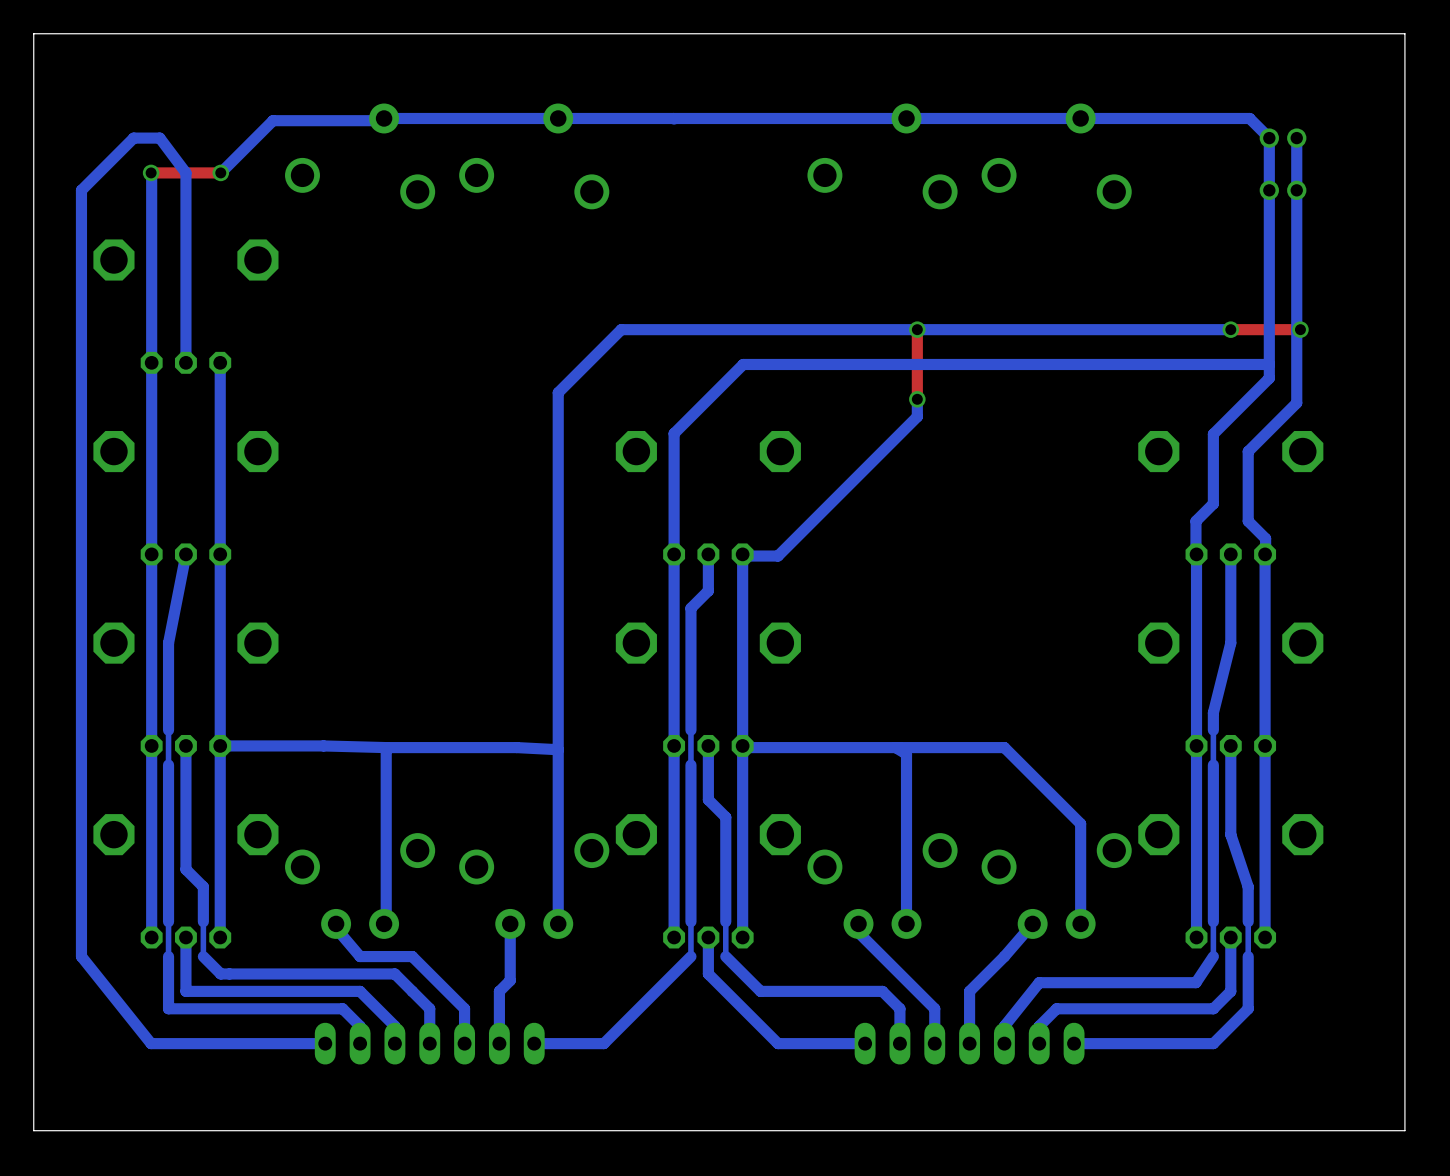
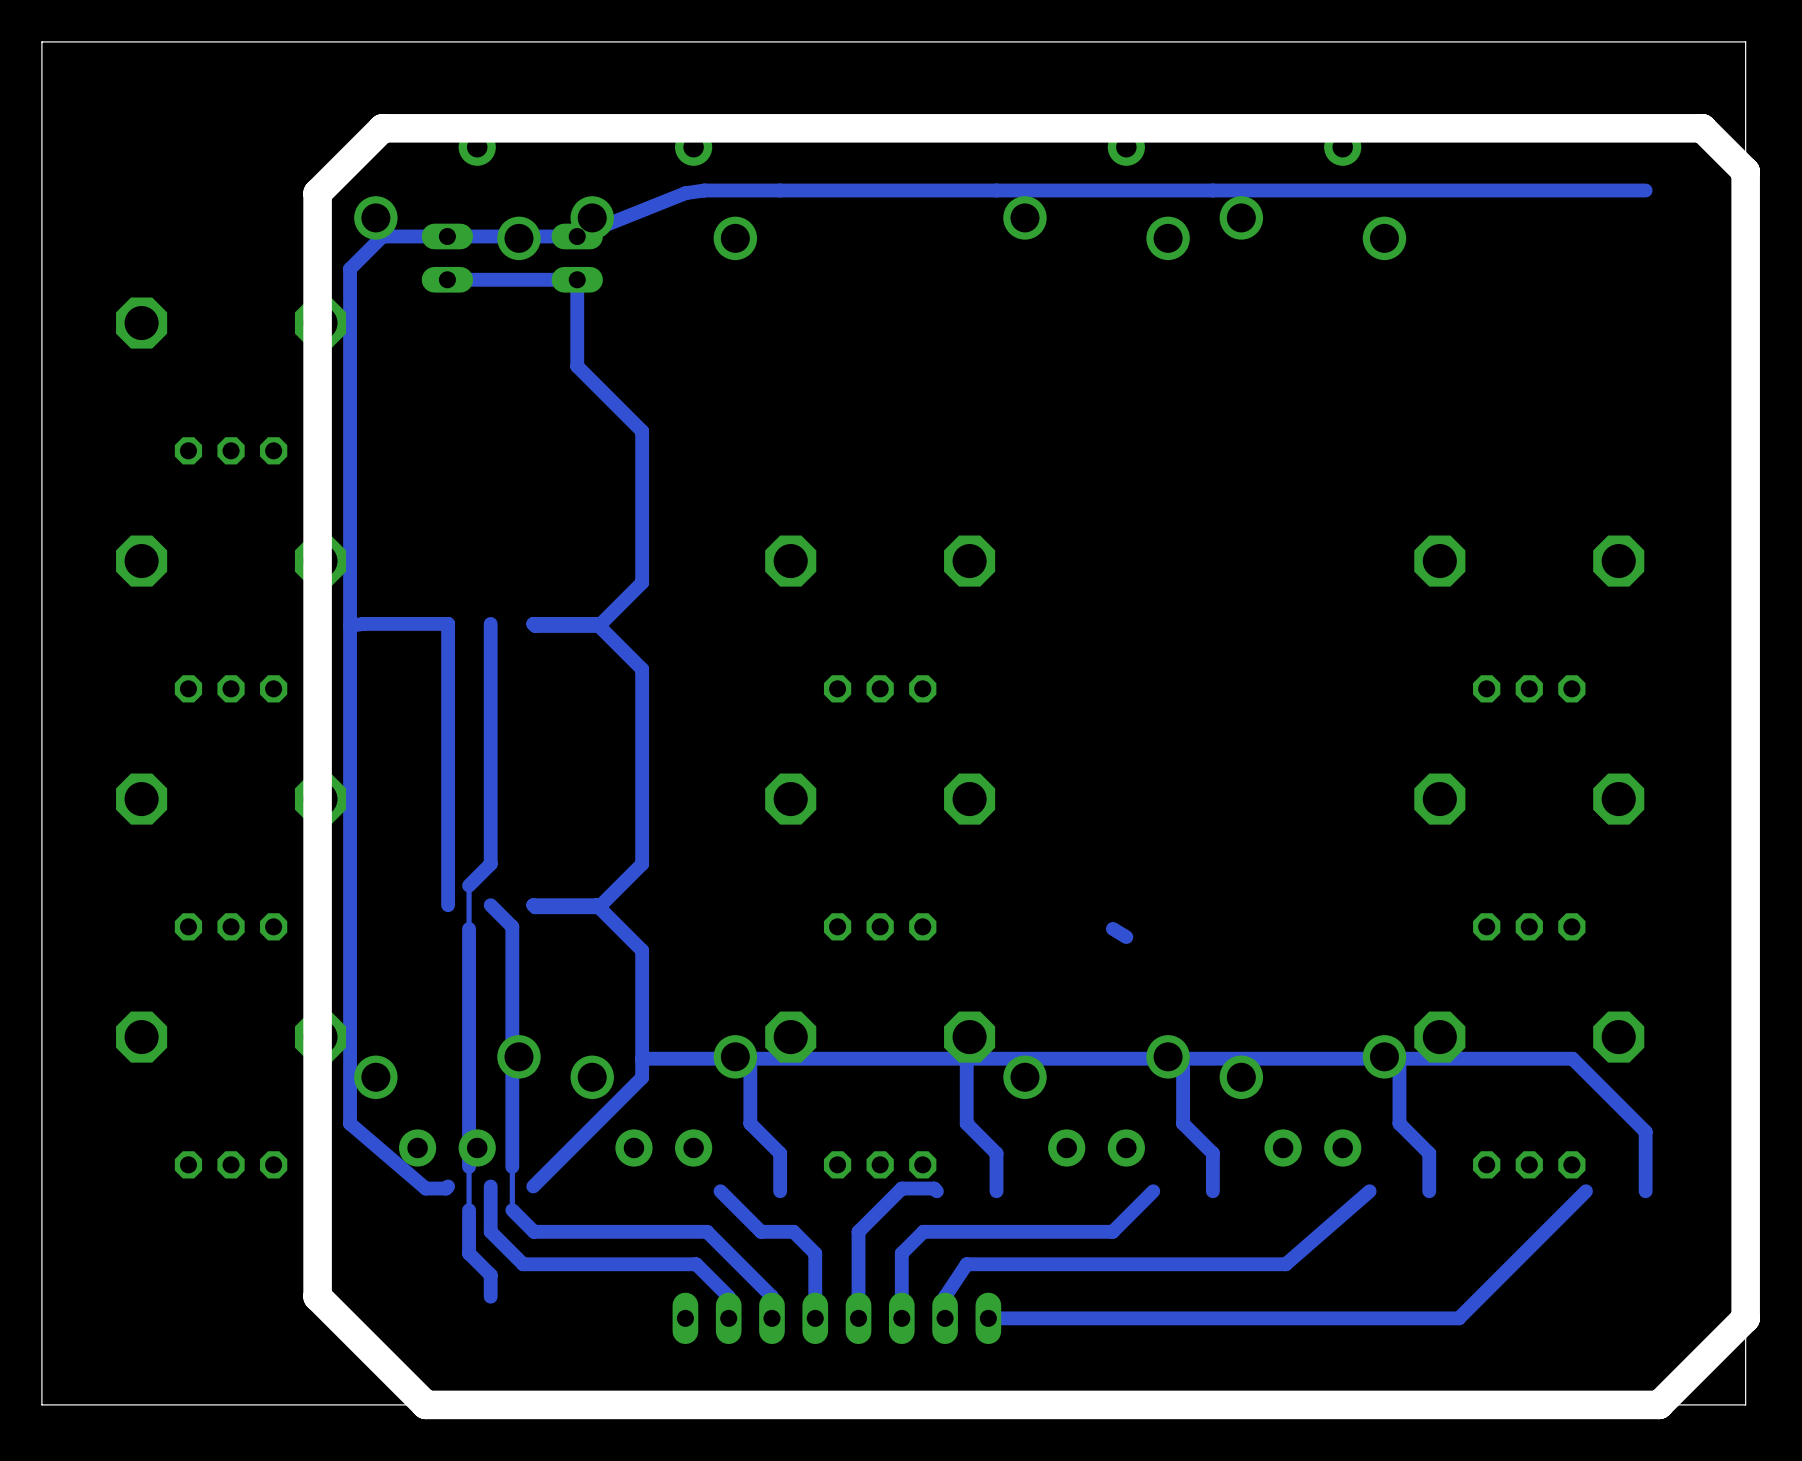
board edge: none -> (1702, 128) (382, 128) (317, 193) (317, 1296) (425, 1404) (1659, 1404) (1745, 1318) (1745, 171) (1702, 128)
part: (1283, 138) -> none
bottom track: (1296, 138) (1296, 403) (1248, 451) (1248, 521) (1265, 538) (1265, 937) -> none
bottom track: none -> (1645, 190) (704, 190) (685, 193) (577, 236) (382, 236) (350, 268) (350, 1123) (425, 1188) (446, 1188) (448, 1186)
bottom track: (151, 172) (151, 937) -> none
via: (151, 172) -> none
bottom track: (220, 172) (273, 120) (381, 120) (384, 118) (1249, 118) (1269, 138) (1269, 378) (1213, 434) (1213, 503) (1195, 521) (1196, 937) -> none
top track: (220, 172) (151, 172) -> none
via: (220, 172) -> none
part: (1283, 190) -> none
part: none -> (447, 258)
part: none -> (577, 258)
bottom track: none -> (447, 279) (577, 279) (577, 366) (642, 431) (642, 582) (598, 625) (535, 625) (533, 623) (596, 623) (642, 669) (642, 863) (598, 907) (535, 907) (533, 905) (596, 905) (642, 950) (642, 1077) (533, 1186)
top track: (917, 329) (917, 399) -> none
via: (917, 329) -> none
bottom track: (1230, 329) (621, 329) (558, 392) (558, 923) -> none
via: (1230, 329) -> none
top track: (1300, 329) (1230, 329) -> none
via: (1300, 329) -> none
bottom track: (185, 362) (185, 172) (159, 138) (133, 138) (81, 190) (81, 956) (151, 1043) (325, 1043) -> none
bottom track: (220, 362) (220, 937) -> none
bottom track: (1269, 364) (743, 364) (674, 433) (674, 937) -> none
bottom track: (917, 399) (917, 416) (778, 556) (744, 556) (742, 554) (742, 937) -> none
via: (917, 399) -> none
bottom track: none -> (350, 625) (362, 623) (448, 623) (448, 905)
bottom track: (185, 554) (168, 643) (168, 1008) (342, 1008) (360, 1026) (360, 1043) -> none
bottom track: (708, 554) (708, 590) (690, 608) (690, 956) (603, 1043) (534, 1043) -> none
bottom track: (1230, 554) (1230, 643) (1213, 712) (1213, 956) (1195, 982) (1039, 982) (1004, 1026) (1004, 1043) -> none
bottom track: none -> (490, 905) (512, 926) (512, 1210) (533, 1231) (707, 1231) (771, 1296) (771, 1318)
bottom track: (185, 745) (185, 869) (203, 886) (203, 956) (220, 973) (394, 973) (429, 1008) (429, 1043) -> none
bottom track: (220, 745) (386, 747) -> none
bottom track: (708, 745) (708, 799) (725, 817) (725, 956) (760, 991) -> (901, 1318) (901, 1253) (923, 1231) (945, 1231)
bottom track: (742, 745) (744, 747) (1004, 747) (1080, 823) (1080, 923) -> none
bottom track: (1230, 745) (1230, 834) (1248, 886) (1248, 1008) (1213, 1043) (1074, 1043) -> none
bottom track: (386, 747) (516, 747) (558, 749) -> none
bottom track: (386, 747) (386, 917) (384, 923) -> none
bottom track: (899, 747) (906, 754) (906, 923) -> none
bottom track: none -> (642, 1058) (1572, 1058) (1645, 1131) (1645, 1191)
bottom track: none -> (750, 1058) (750, 1123) (780, 1153) (780, 1191)
bottom track: none -> (966, 1058) (966, 1123) (996, 1153) (996, 1191)
bottom track: none -> (1183, 1058) (1183, 1123) (1212, 1153) (1212, 1191)
bottom track: none -> (1399, 1058) (1399, 1123) (1429, 1153) (1429, 1191)
bottom track: (336, 923) (336, 928) (360, 956) (412, 956) (464, 1008) (464, 1043) -> none
bottom track: (510, 923) (510, 980) (499, 991) (499, 1043) -> none
bottom track: (858, 923) (858, 932) (934, 1008) (934, 1043) -> none
bottom track: (1032, 923) (1004, 956) (969, 991) (969, 1043) -> none
bottom track: (185, 937) (185, 991) (360, 991) (377, 1008) -> (490, 623) (490, 863) (469, 885) (469, 1253)
bottom track: (708, 937) (708, 973) (778, 1043) (865, 1043) -> none
bottom track: (1230, 937) (1230, 991) (1213, 1008) (1056, 1008) (1039, 1026) (1039, 1043) -> none
bottom track: none -> (490, 1186) (490, 1231) (523, 1264) (696, 1264) (728, 1296) (728, 1318)
bottom track: none -> (720, 1191) (761, 1231) (793, 1231) (815, 1253) (815, 1318)
bottom track: none -> (936, 1191) (934, 1188) (901, 1188) (858, 1231) (858, 1318)
bottom track: none -> (1369, 1191) (1285, 1264) (966, 1264) (945, 1296) (945, 1318)
bottom track: none -> (1586, 1191) (1458, 1318) (988, 1318)
bottom track: (882, 991) (899, 1008) (899, 1043) -> (1096, 1231) (1112, 1231) (1153, 1191)
part: (429, 1043) -> none
part: (969, 1043) -> none
part: none -> (836, 1318)

